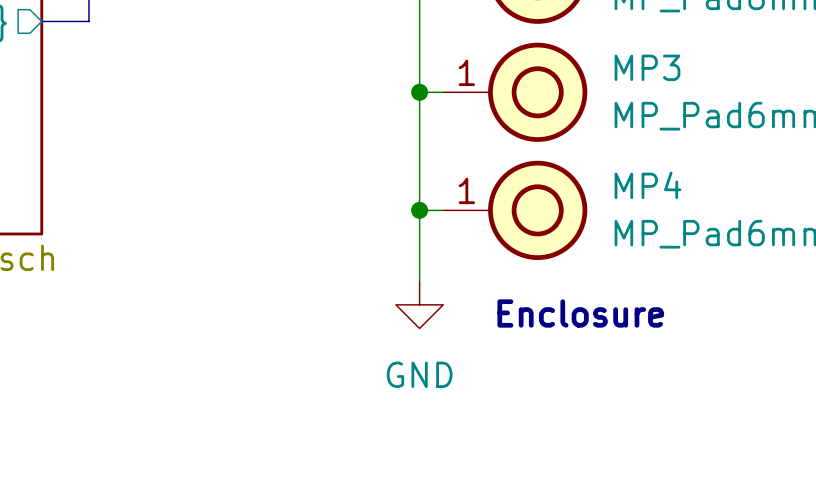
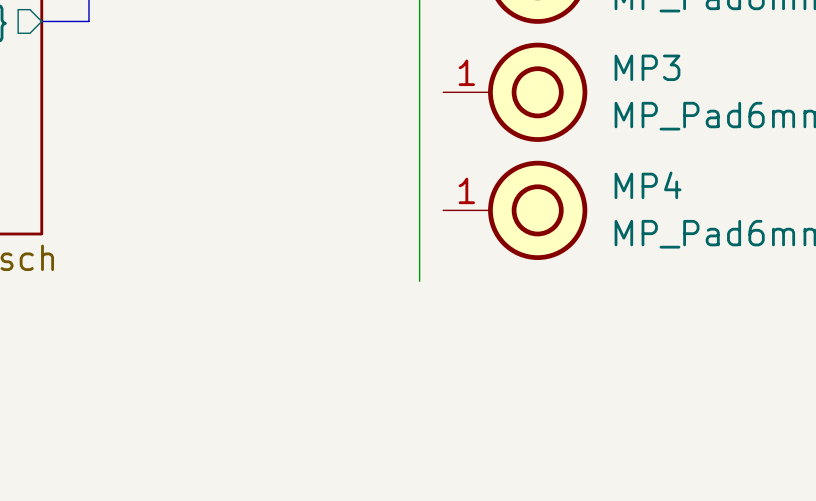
wire: (419, 92) (443, 92) -> none
junction: (419, 92) -> none
wire: (419, 210) (443, 210) -> none
junction: (419, 210) -> none
power symbol: GND (419, 304) -> none
text: Enclosure (580, 313) -> none

